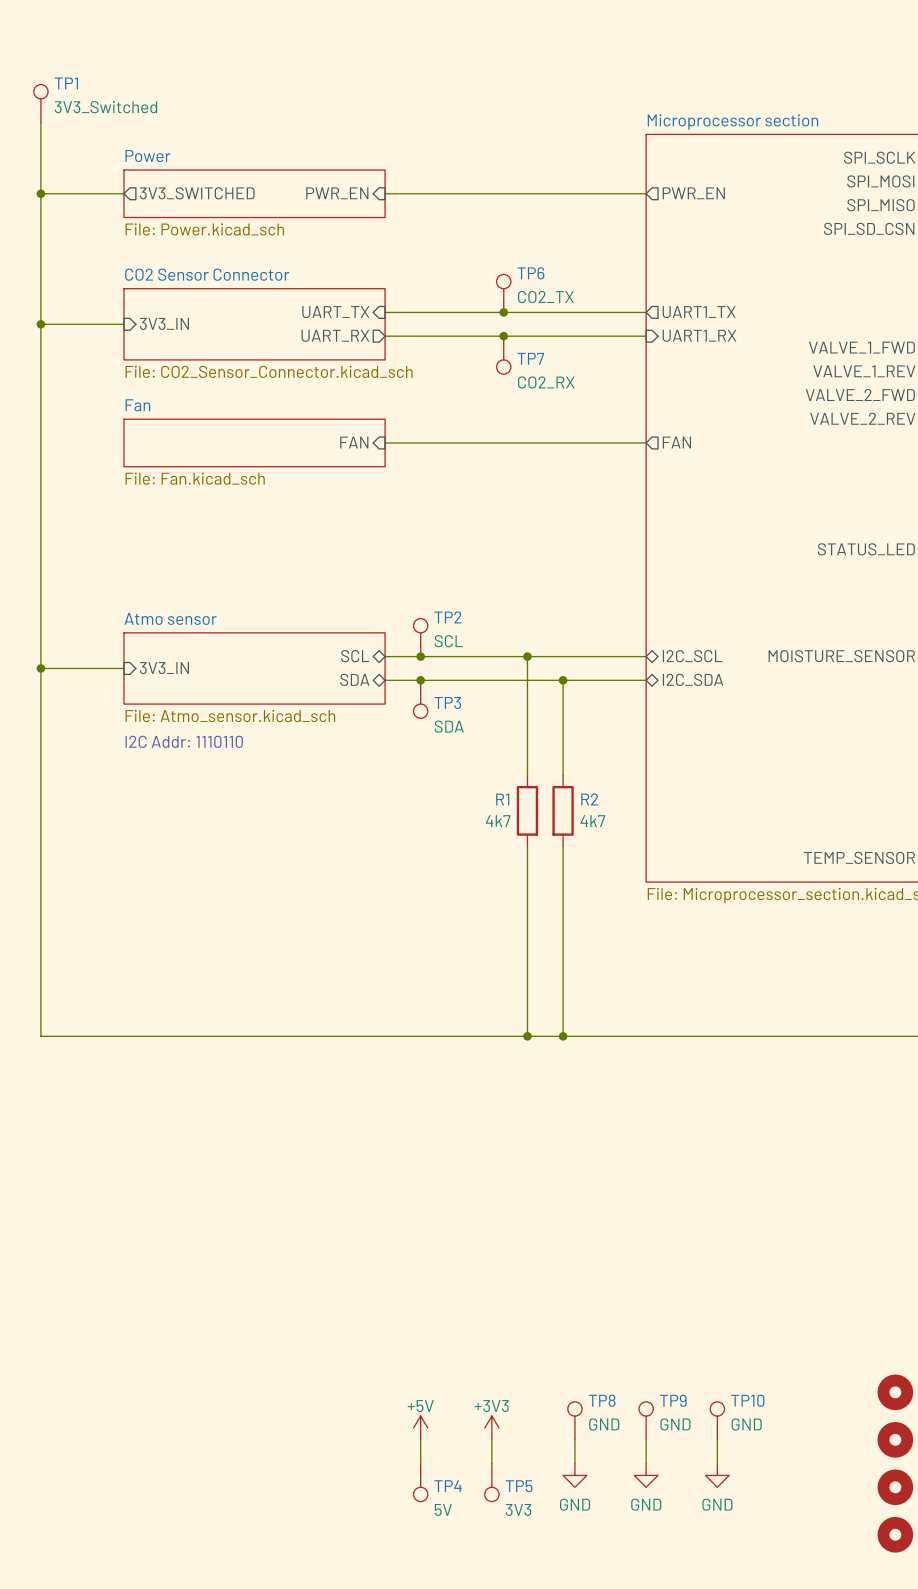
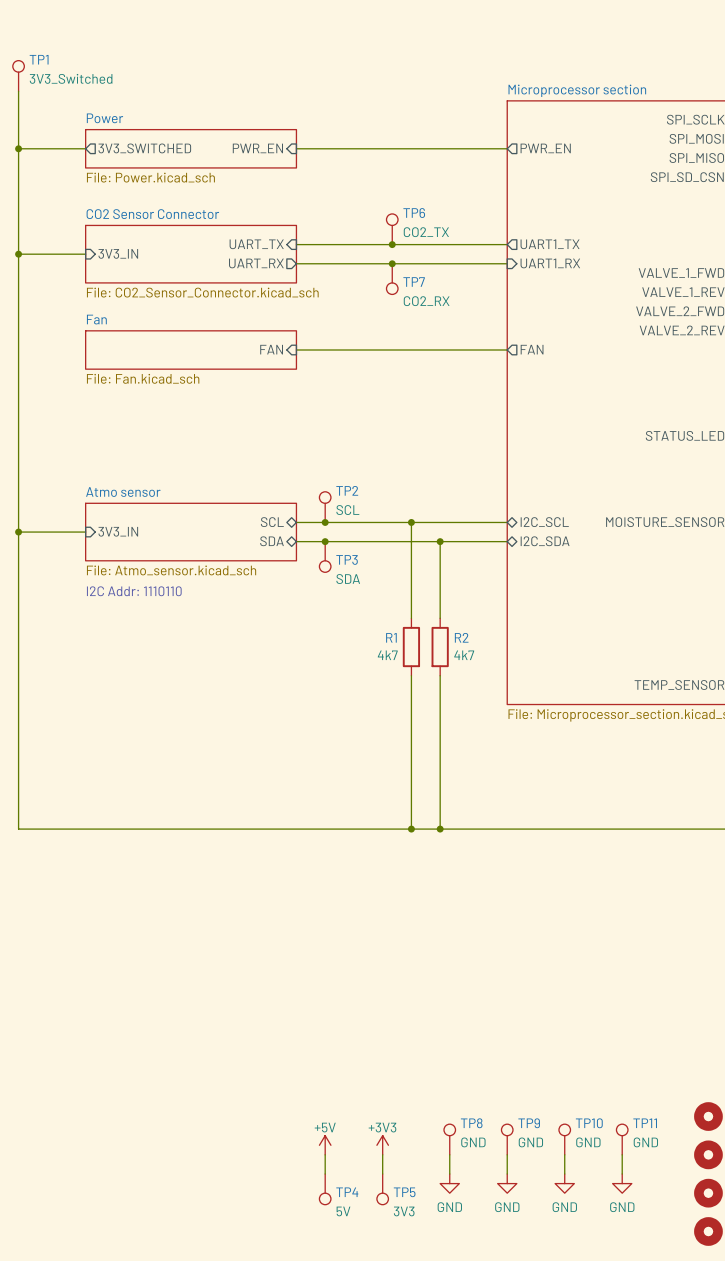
TP11: none -> GND (622, 1139)
wire: none -> (622, 1154) (622, 1174)
power symbol: none -> GND (622, 1183)

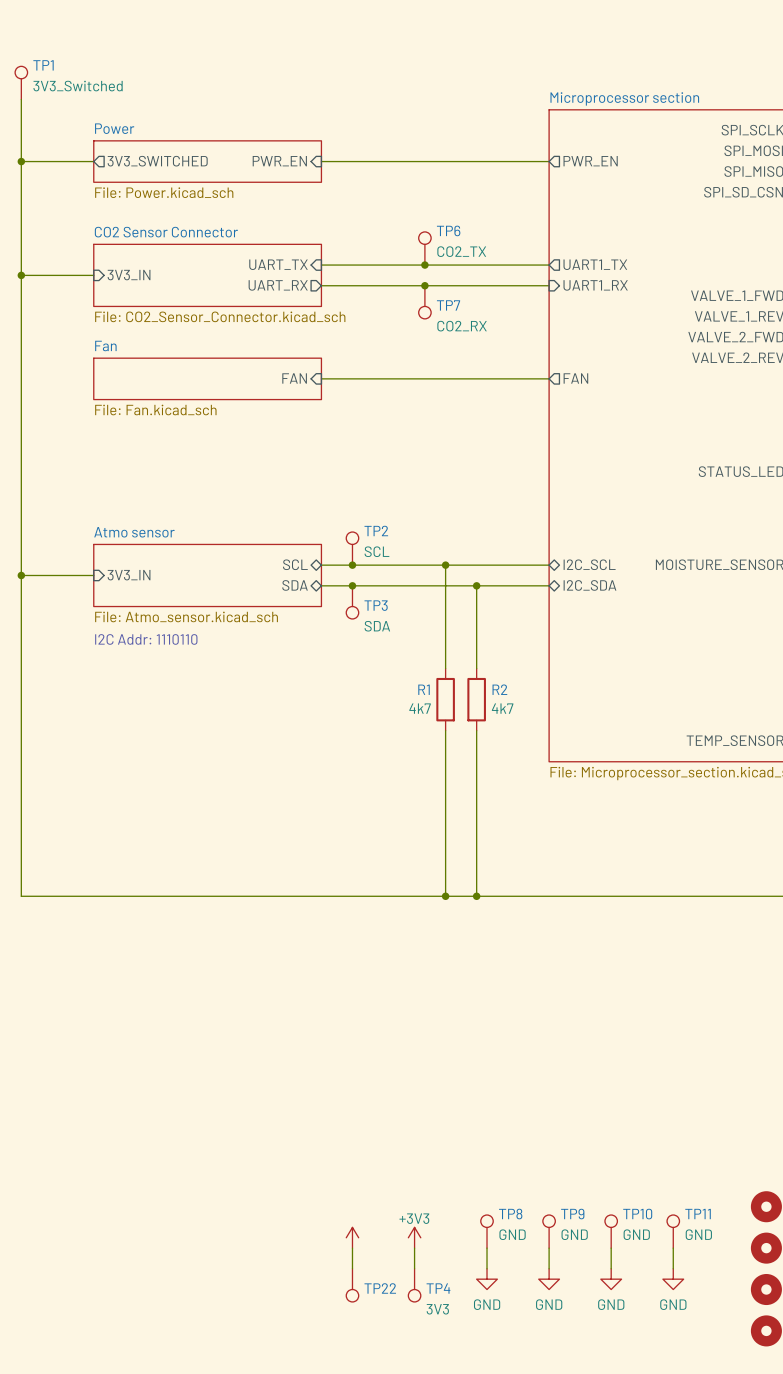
power symbol text: +5V (325, 1127) -> none
TP4 name: TP4 (347, 1192) -> TP22 (380, 1288)
TP5 name: TP5 (404, 1192) -> TP4 (438, 1288)
TP4 value: 5V (343, 1211) -> none

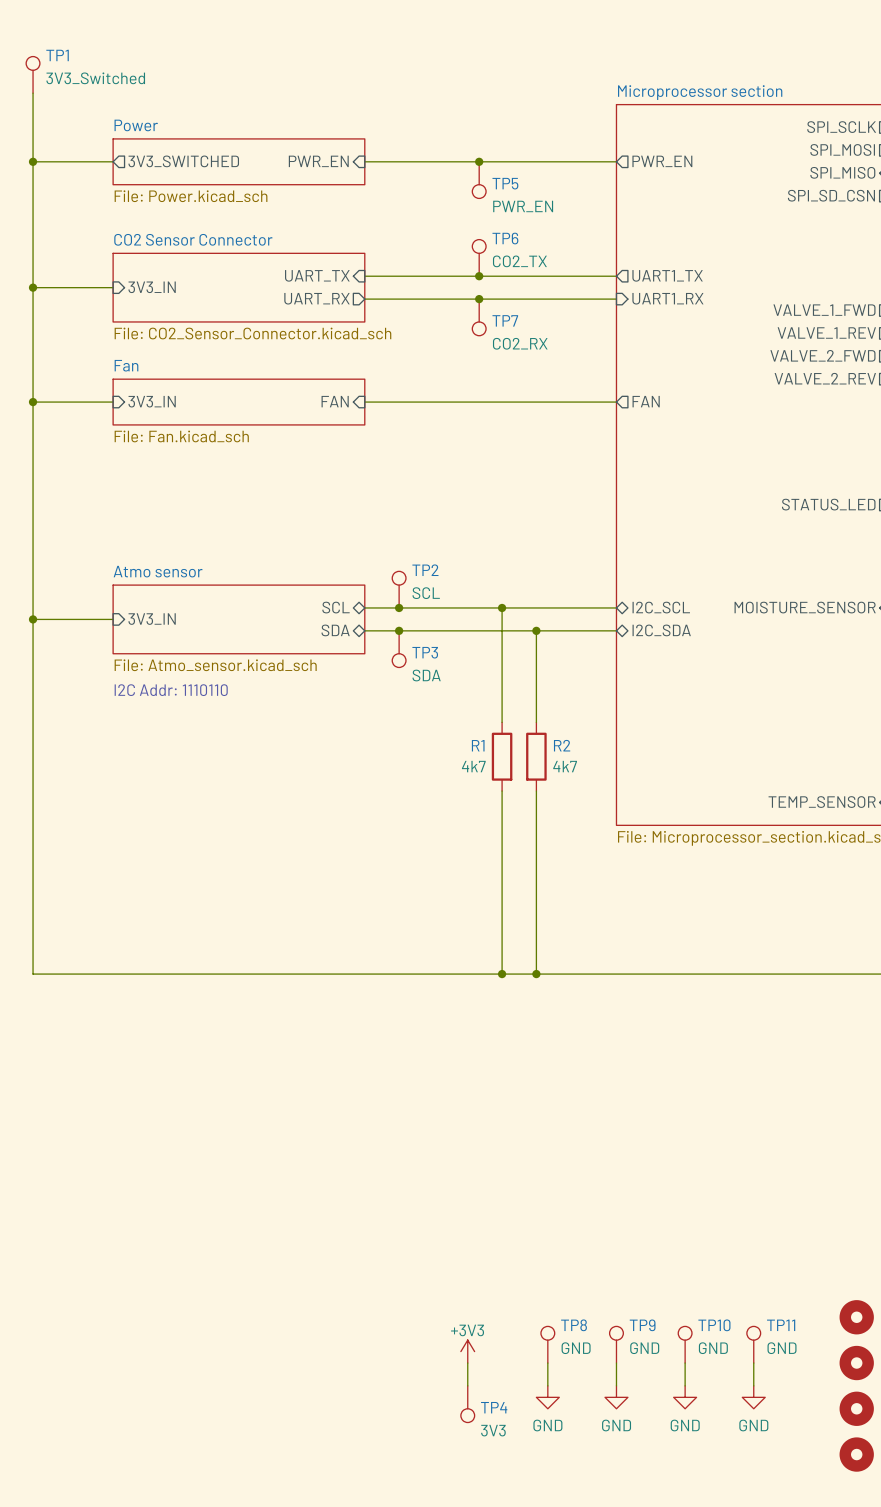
junction: none -> (479, 161)
TP5: none -> PWR_EN (479, 180)
wire: none -> (33, 402) (113, 402)
junction: none -> (33, 402)
sheet pin: none -> 3V3_IN (152, 401)
power symbol: (352, 1237) -> none
wire: (352, 1248) (352, 1268) -> none
TP22: (352, 1285) -> none

